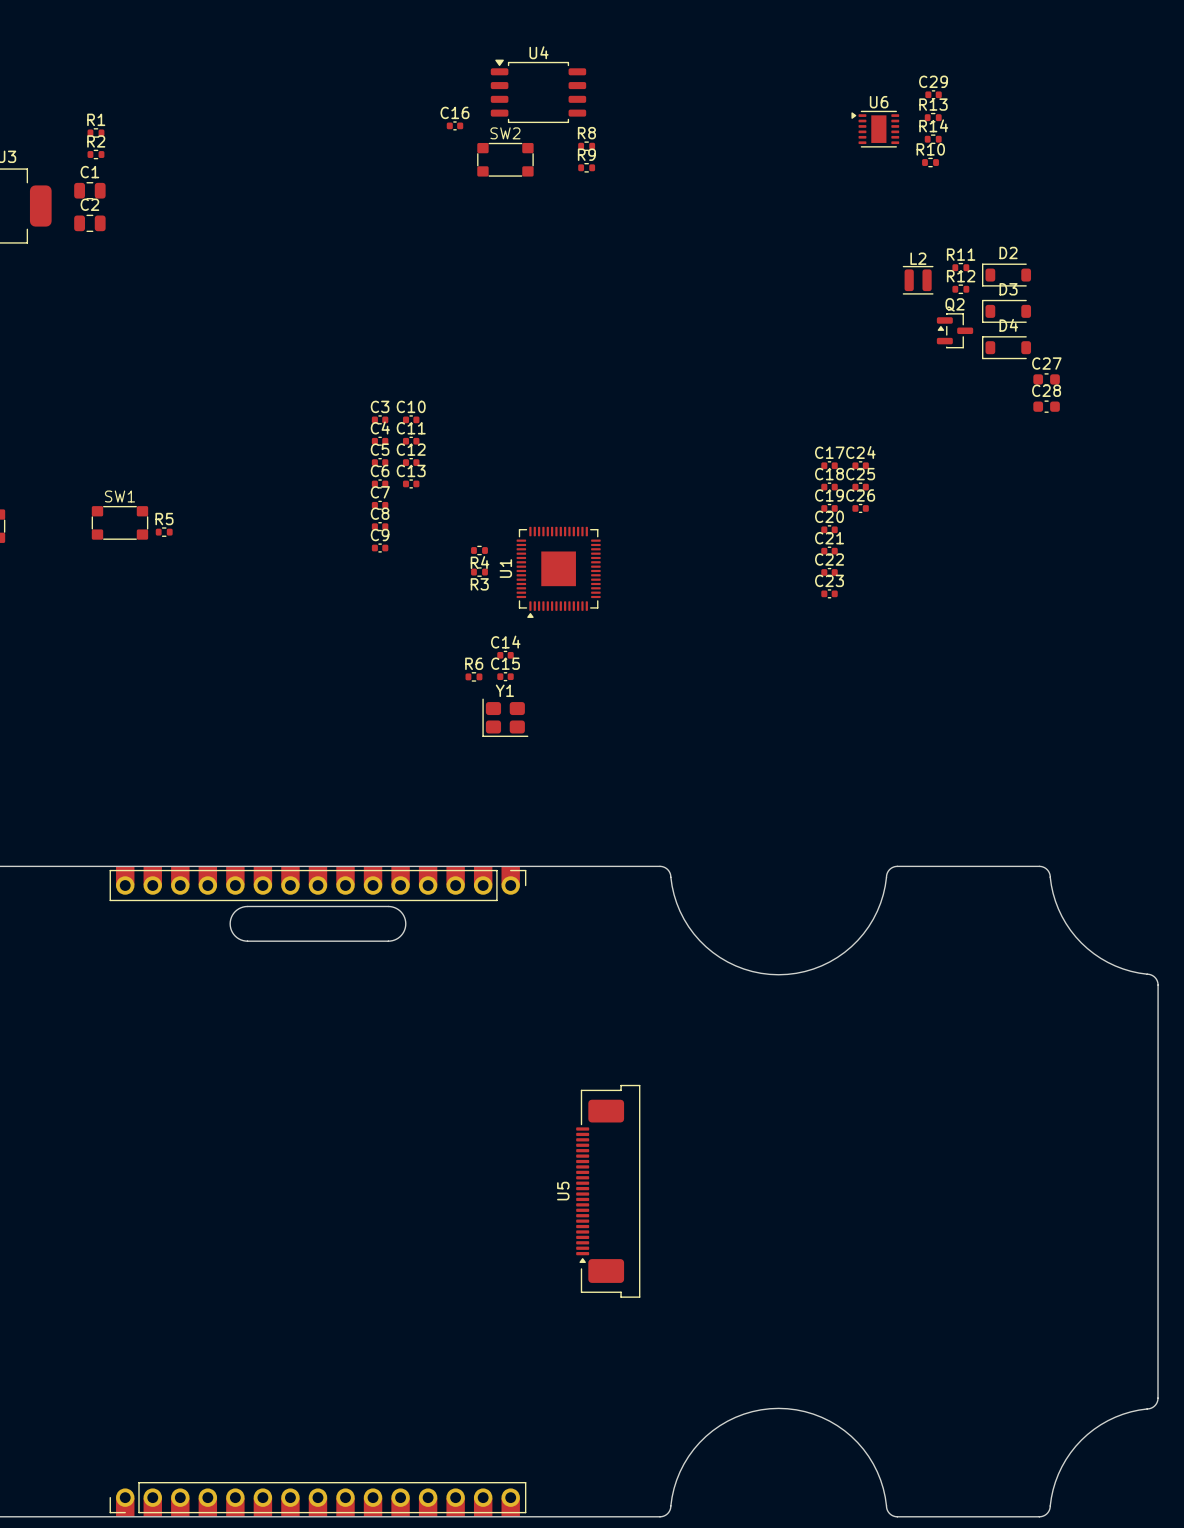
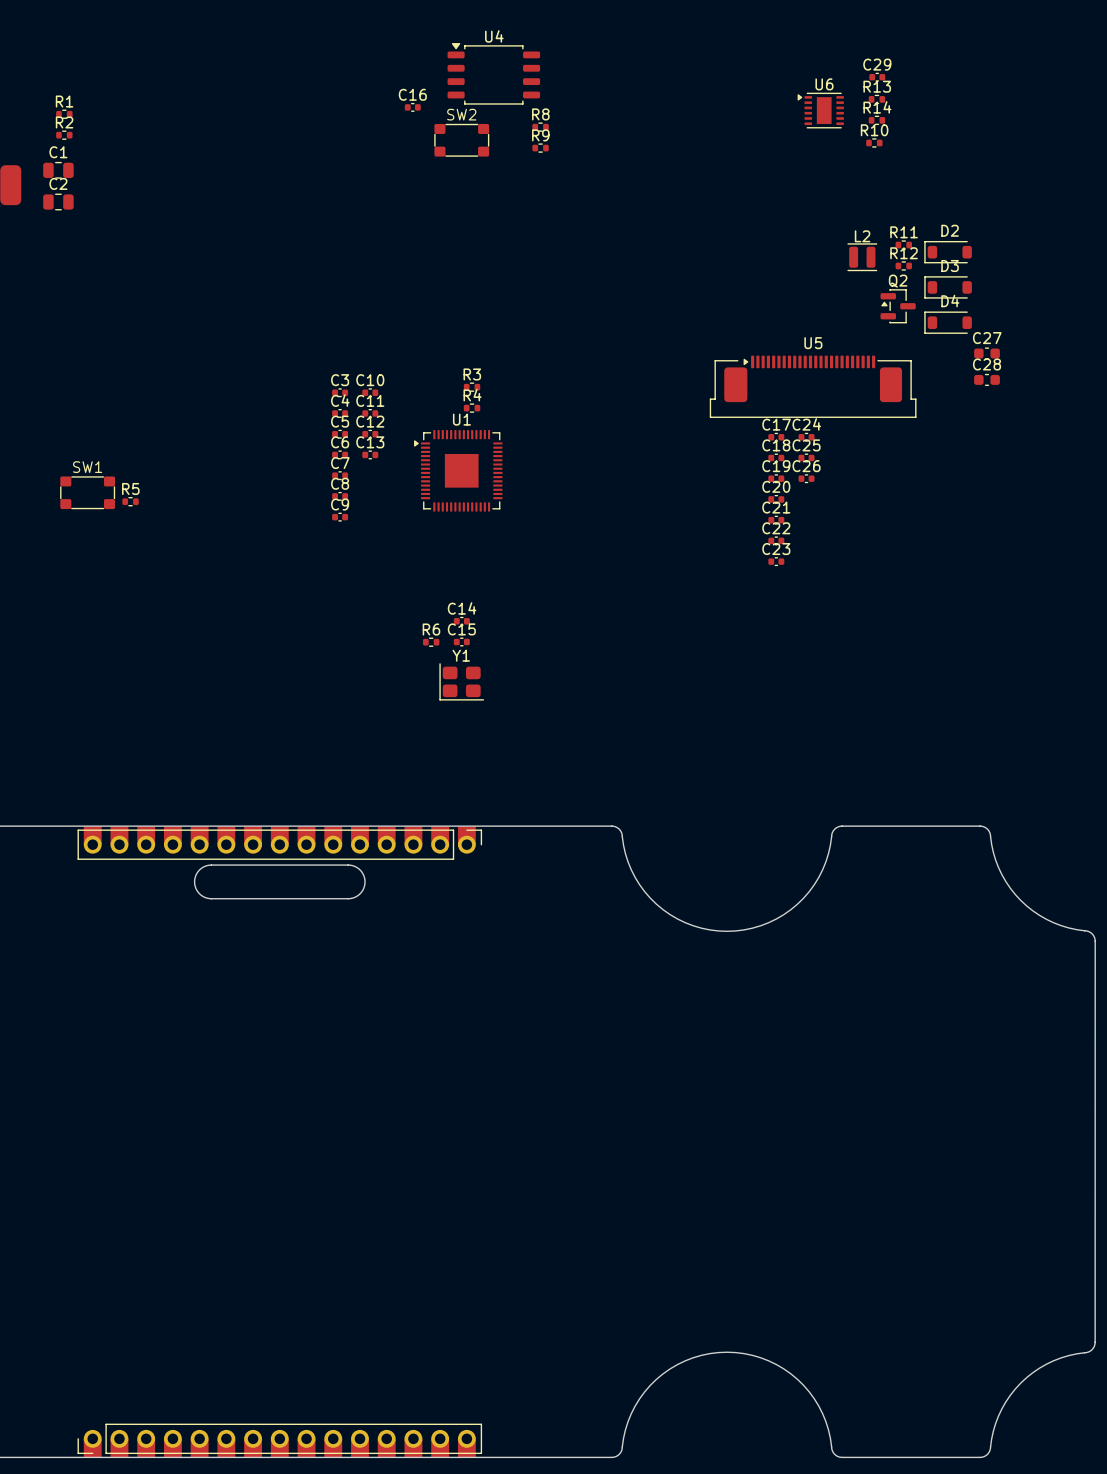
R4 position: (479, 550) -> (472, 408)
R4 name position: R4 (480, 562) -> R4 (472, 395)
R3 position: (479, 572) -> (472, 387)
U1 rotation: 0° (558, 572) -> 90° clockwise (458, 470)
U1 position: (558, 572) -> (458, 470)
R3 name position: R3 (479, 584) -> R3 (472, 374)
U5 rotation: 0° (608, 1191) -> 90° clockwise (813, 386)
U5 position: (608, 1191) -> (813, 386)

